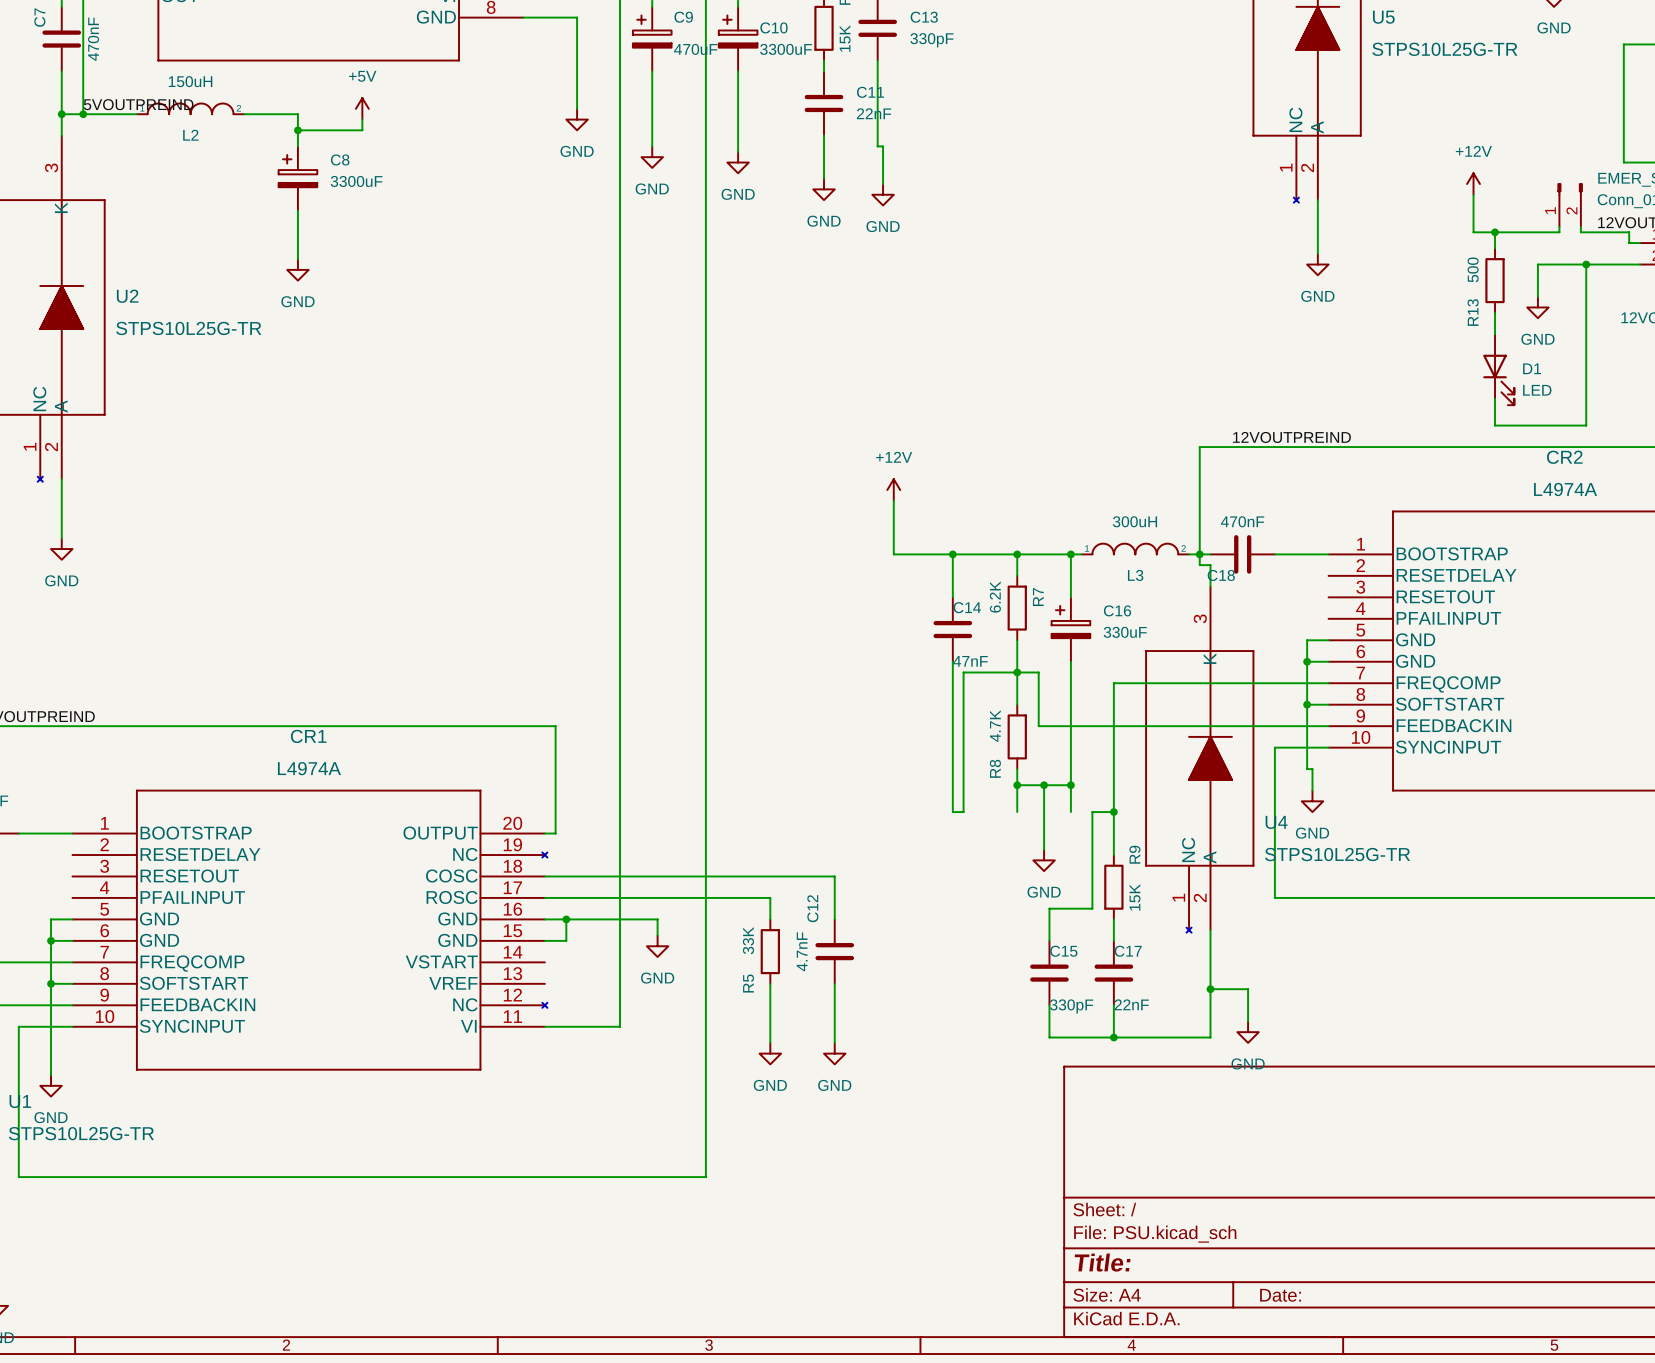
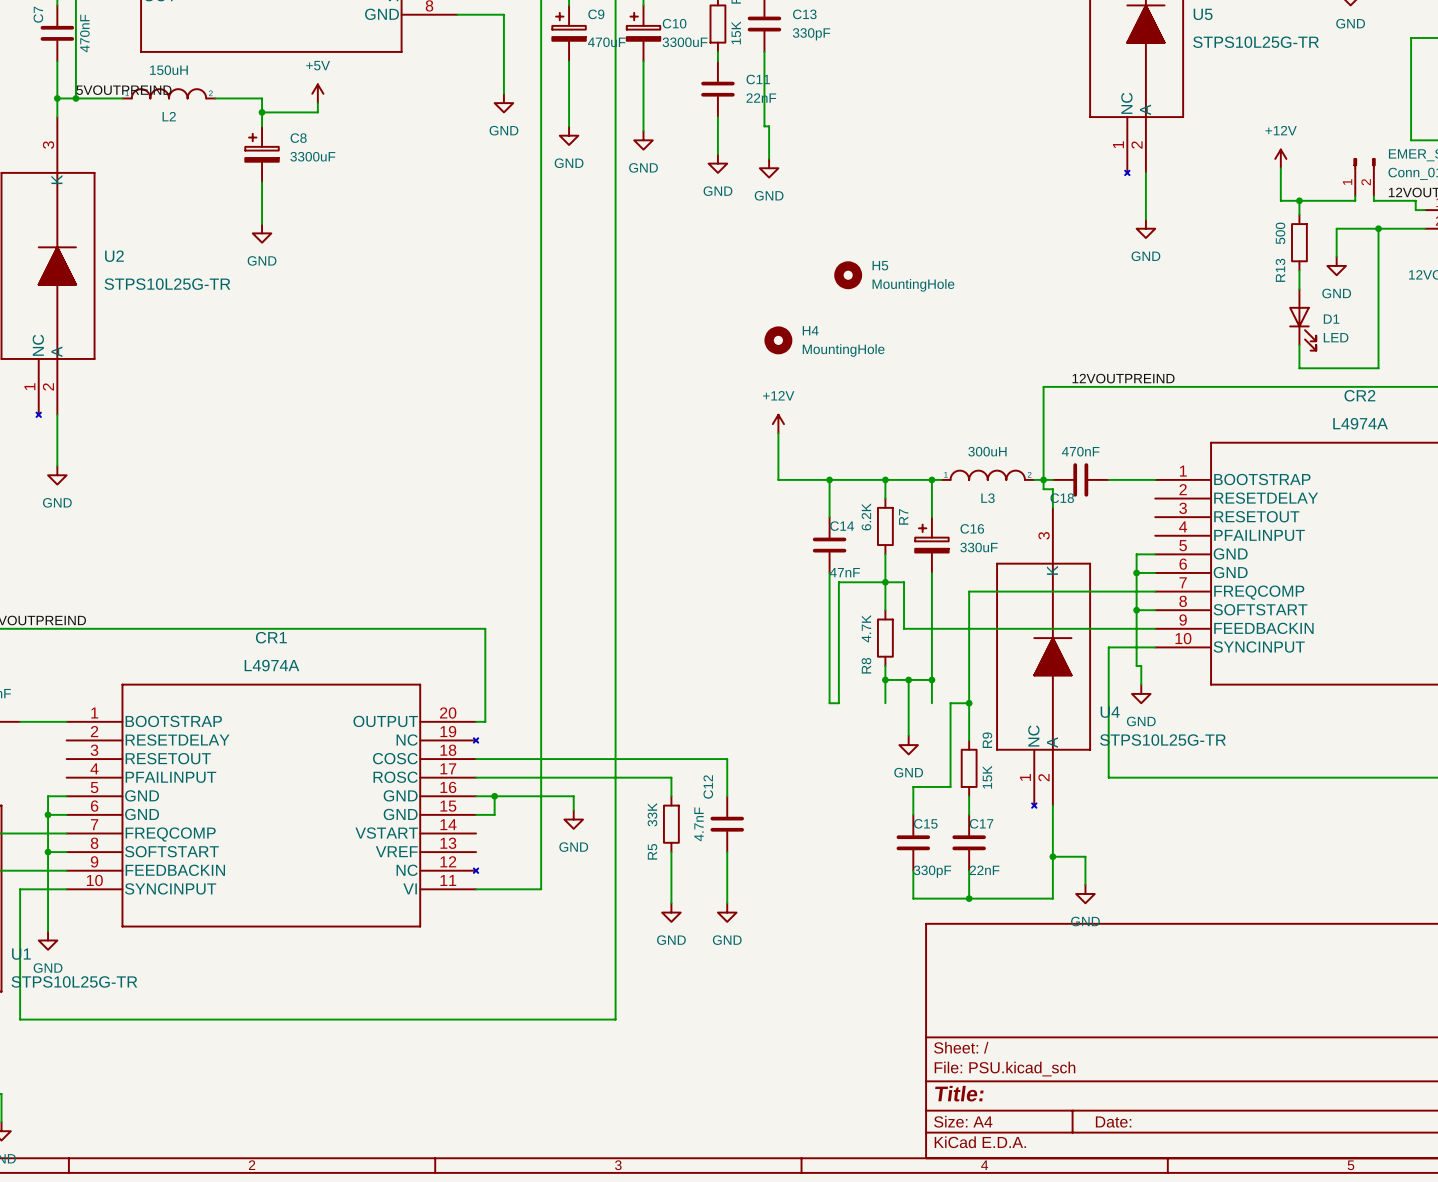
H5: none -> MountingHole (848, 275)
H4: none -> MountingHole (778, 340)

